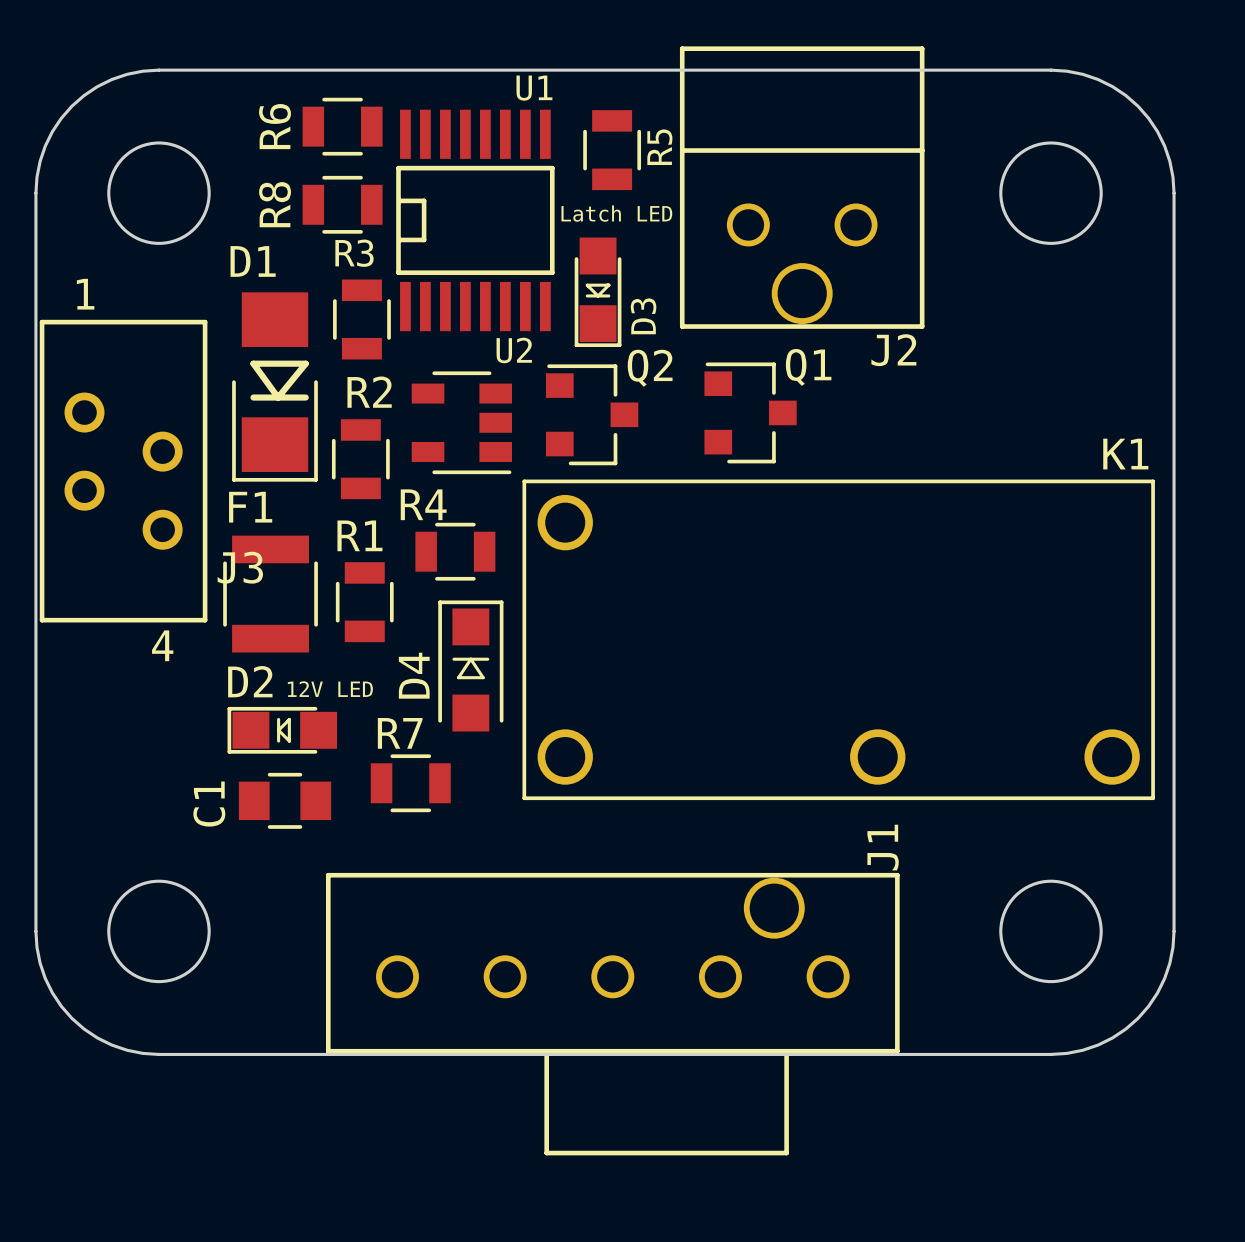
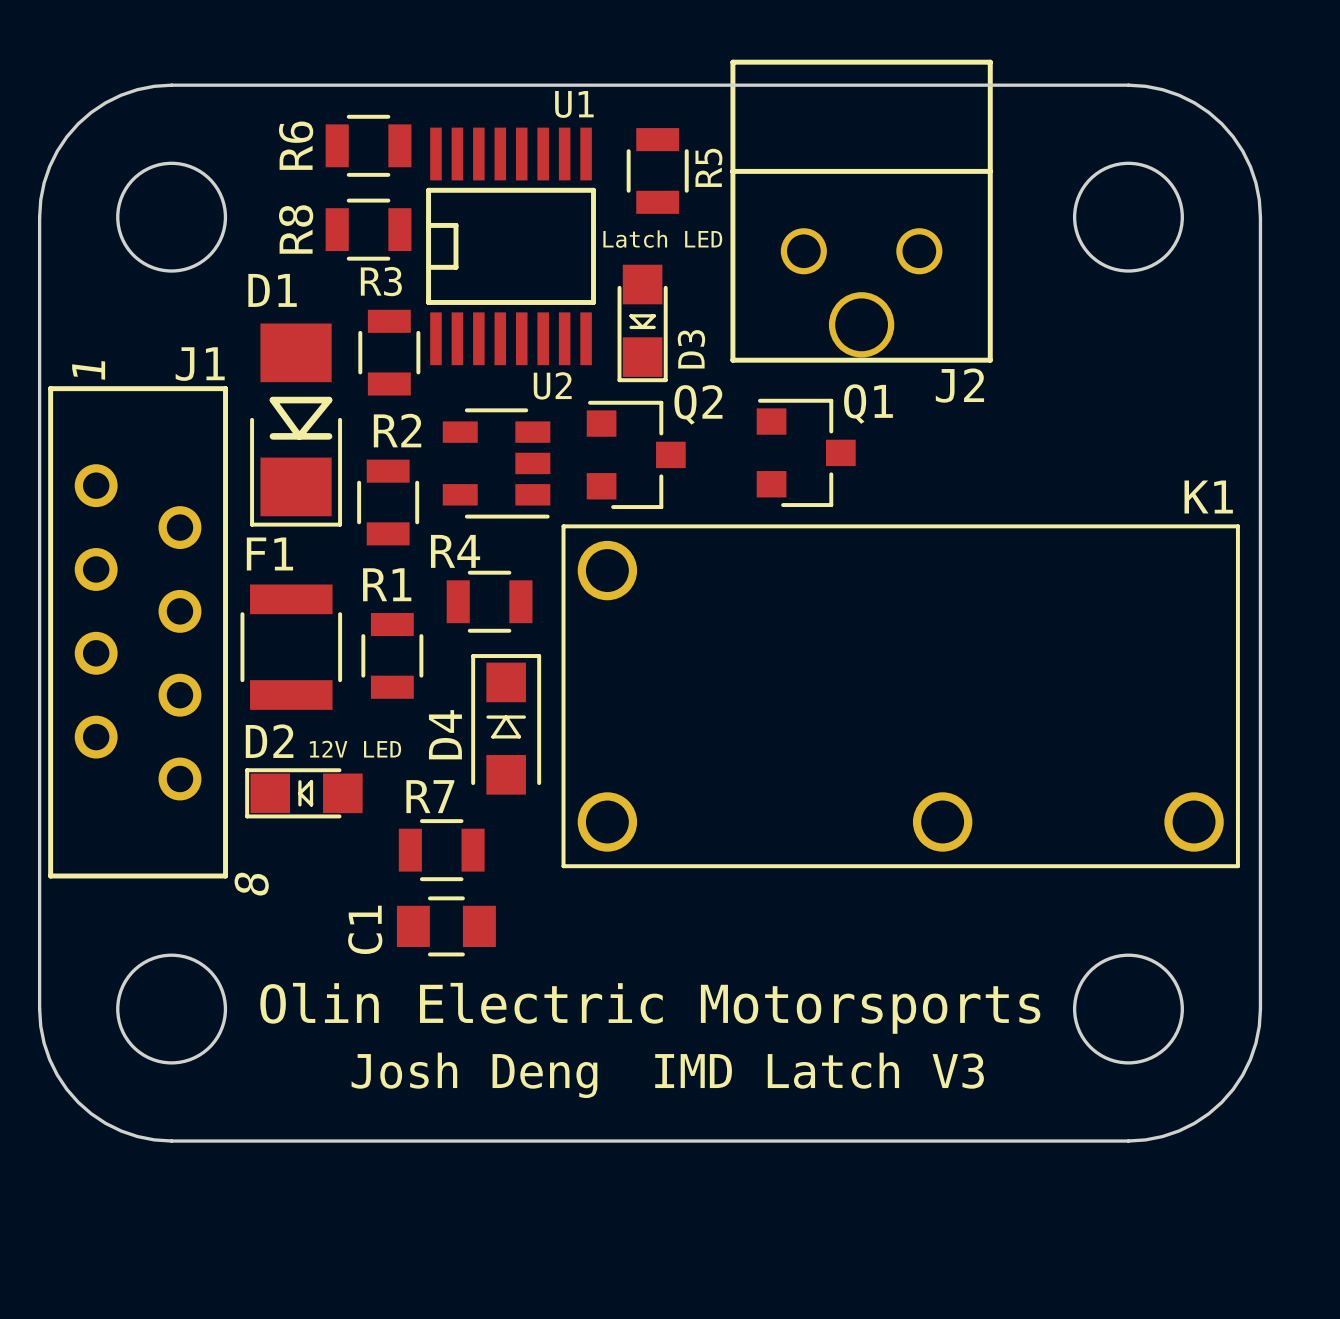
J3: (123, 471) -> none
C1 position: (285, 800) -> (446, 926)
J1 name position: J1 (883, 847) -> J1 (200, 364)
J1 footprint: [325, 872, 900, 1156] -> [48, 386, 228, 879]
text: none -> Olin Electric Motorsports (650, 1008)
text: none -> IMD Latch V3 (819, 1070)
text: none -> Josh Deng (474, 1075)

